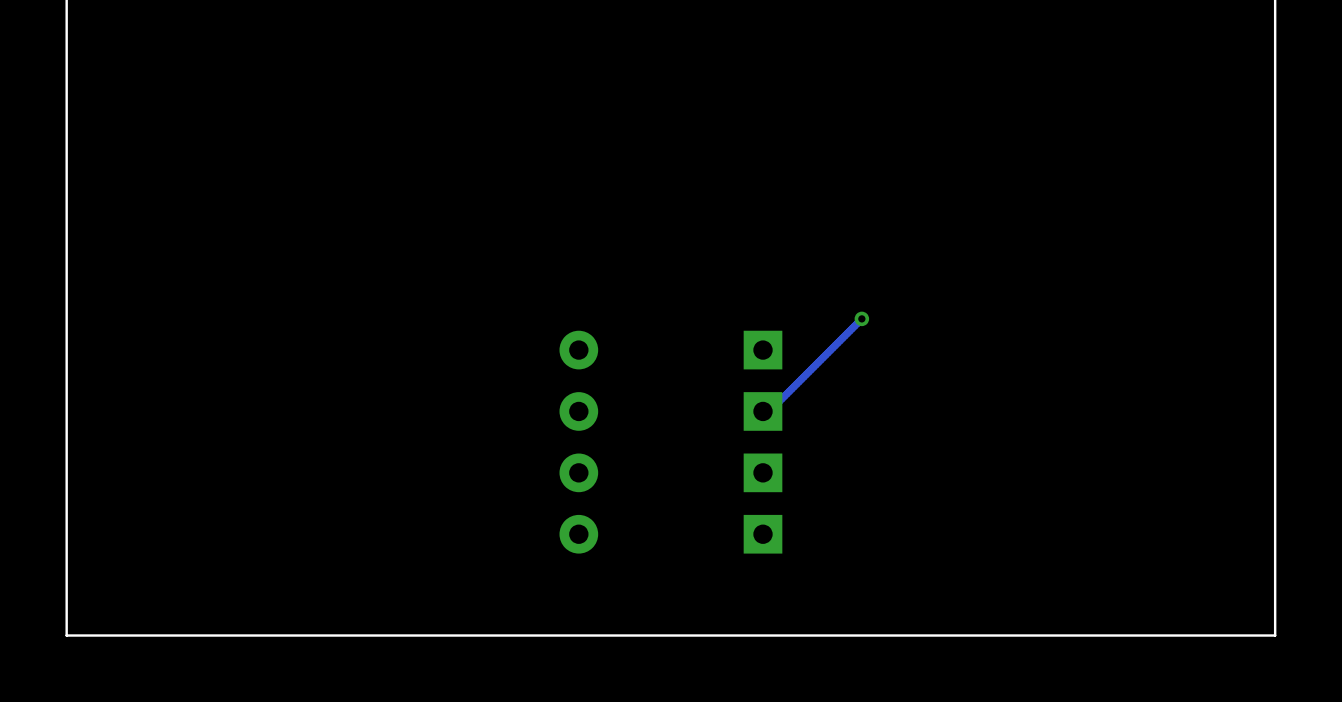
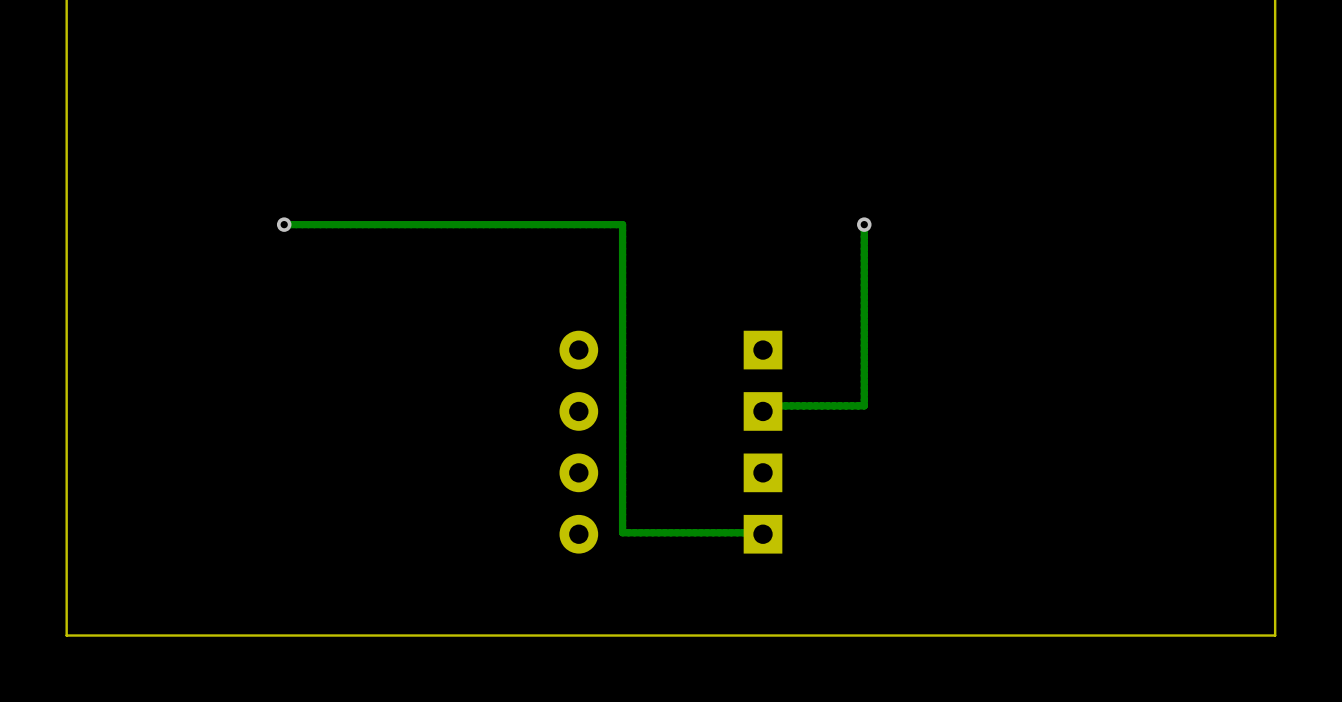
track: none -> (284, 224) (622, 224) (622, 532) (767, 532) (763, 534)
via: none -> (284, 224)
track: (861, 318) (770, 410) (763, 411) -> (864, 224) (864, 405) (767, 405) (763, 411)
via position: (861, 318) -> (864, 224)

